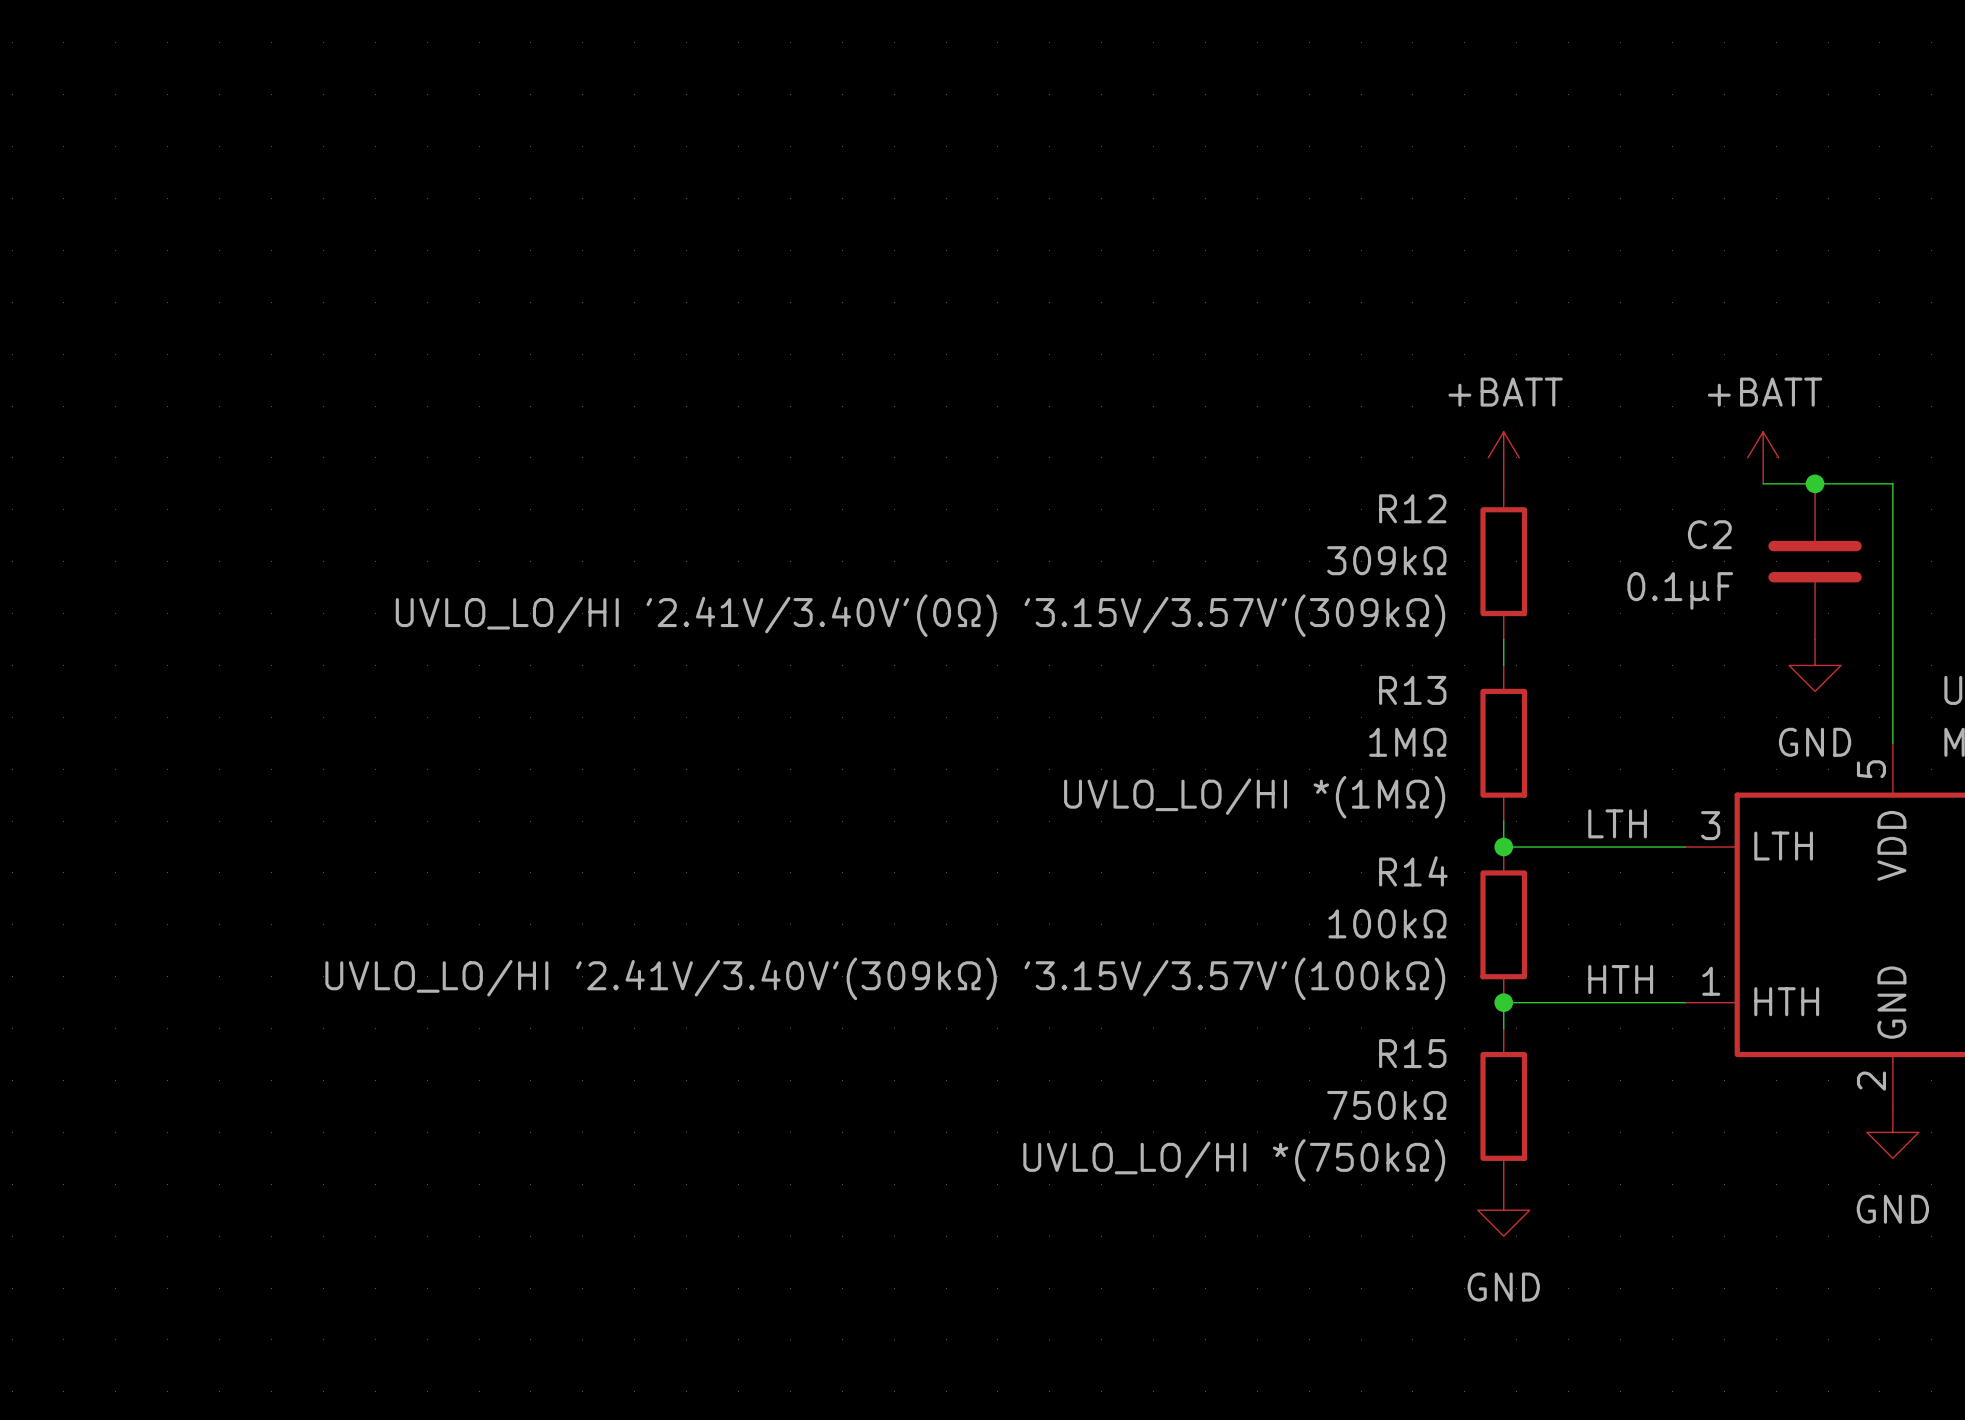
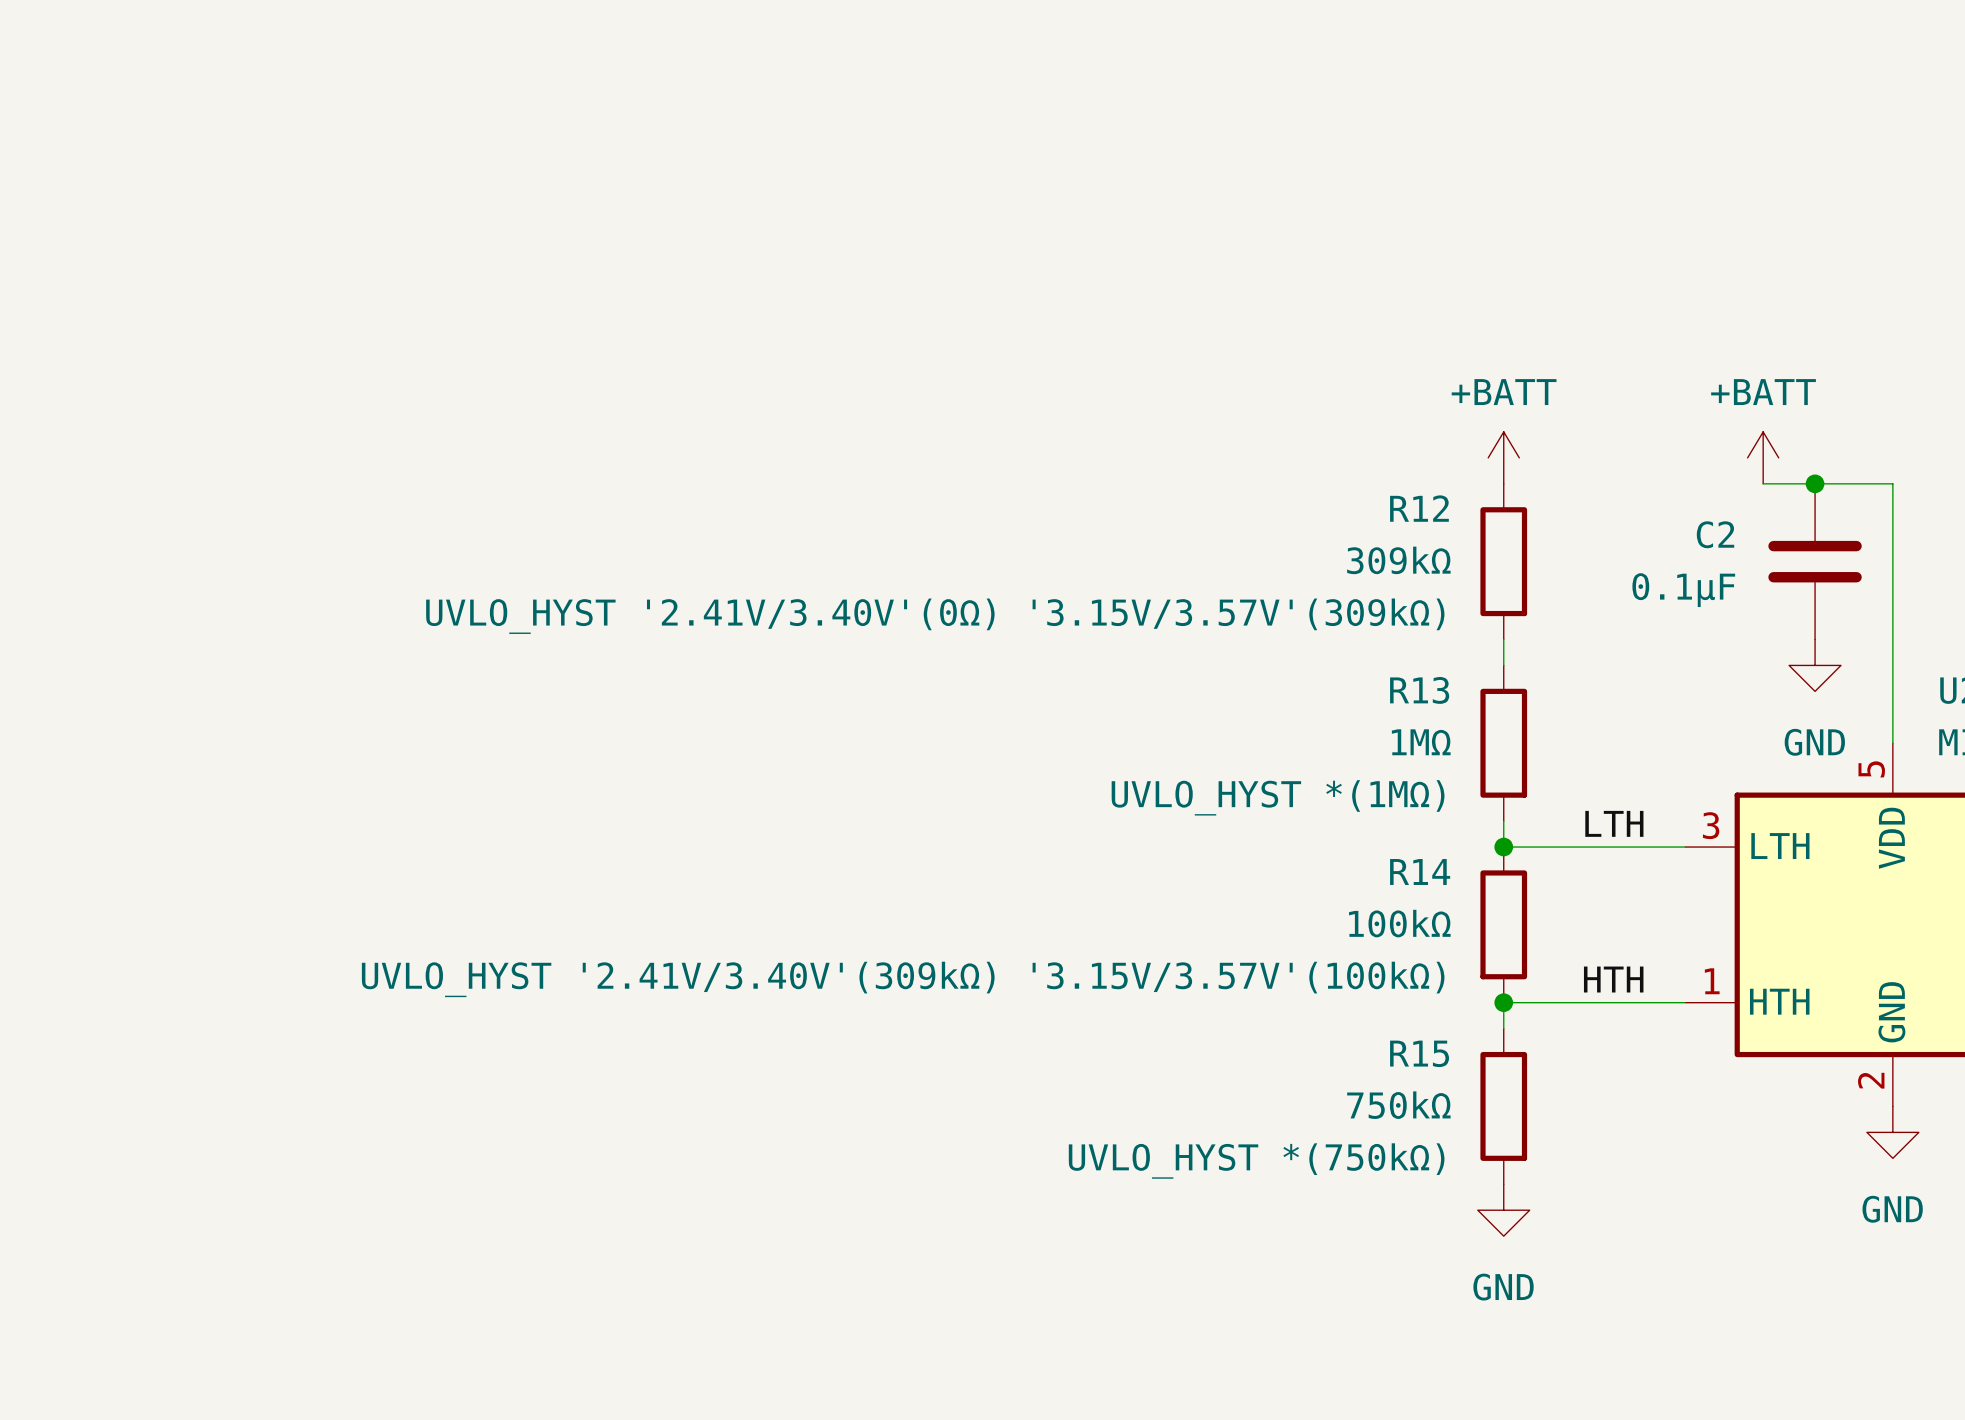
R12 text: UVLO_LO/HI '2.41V/3.40V'(0Ω) '3.15V/3.57V'(309kΩ) (920, 615) -> UVLO_HYST '2.41V/3.40V'(0Ω) '3.15V/3.57V'(309kΩ) (935, 616)
R13 text: UVLO_LO/HI *(1MΩ) (1254, 797) -> UVLO_HYST *(1MΩ) (1278, 797)
R14 text: UVLO_LO/HI '2.41V/3.40V'(309kΩ) '3.15V/3.57V'(100kΩ) (885, 978) -> UVLO_HYST '2.41V/3.40V'(309kΩ) '3.15V/3.57V'(100kΩ) (903, 979)
R15 text: UVLO_LO/HI *(750kΩ) (1234, 1160) -> UVLO_HYST *(750kΩ) (1256, 1161)

